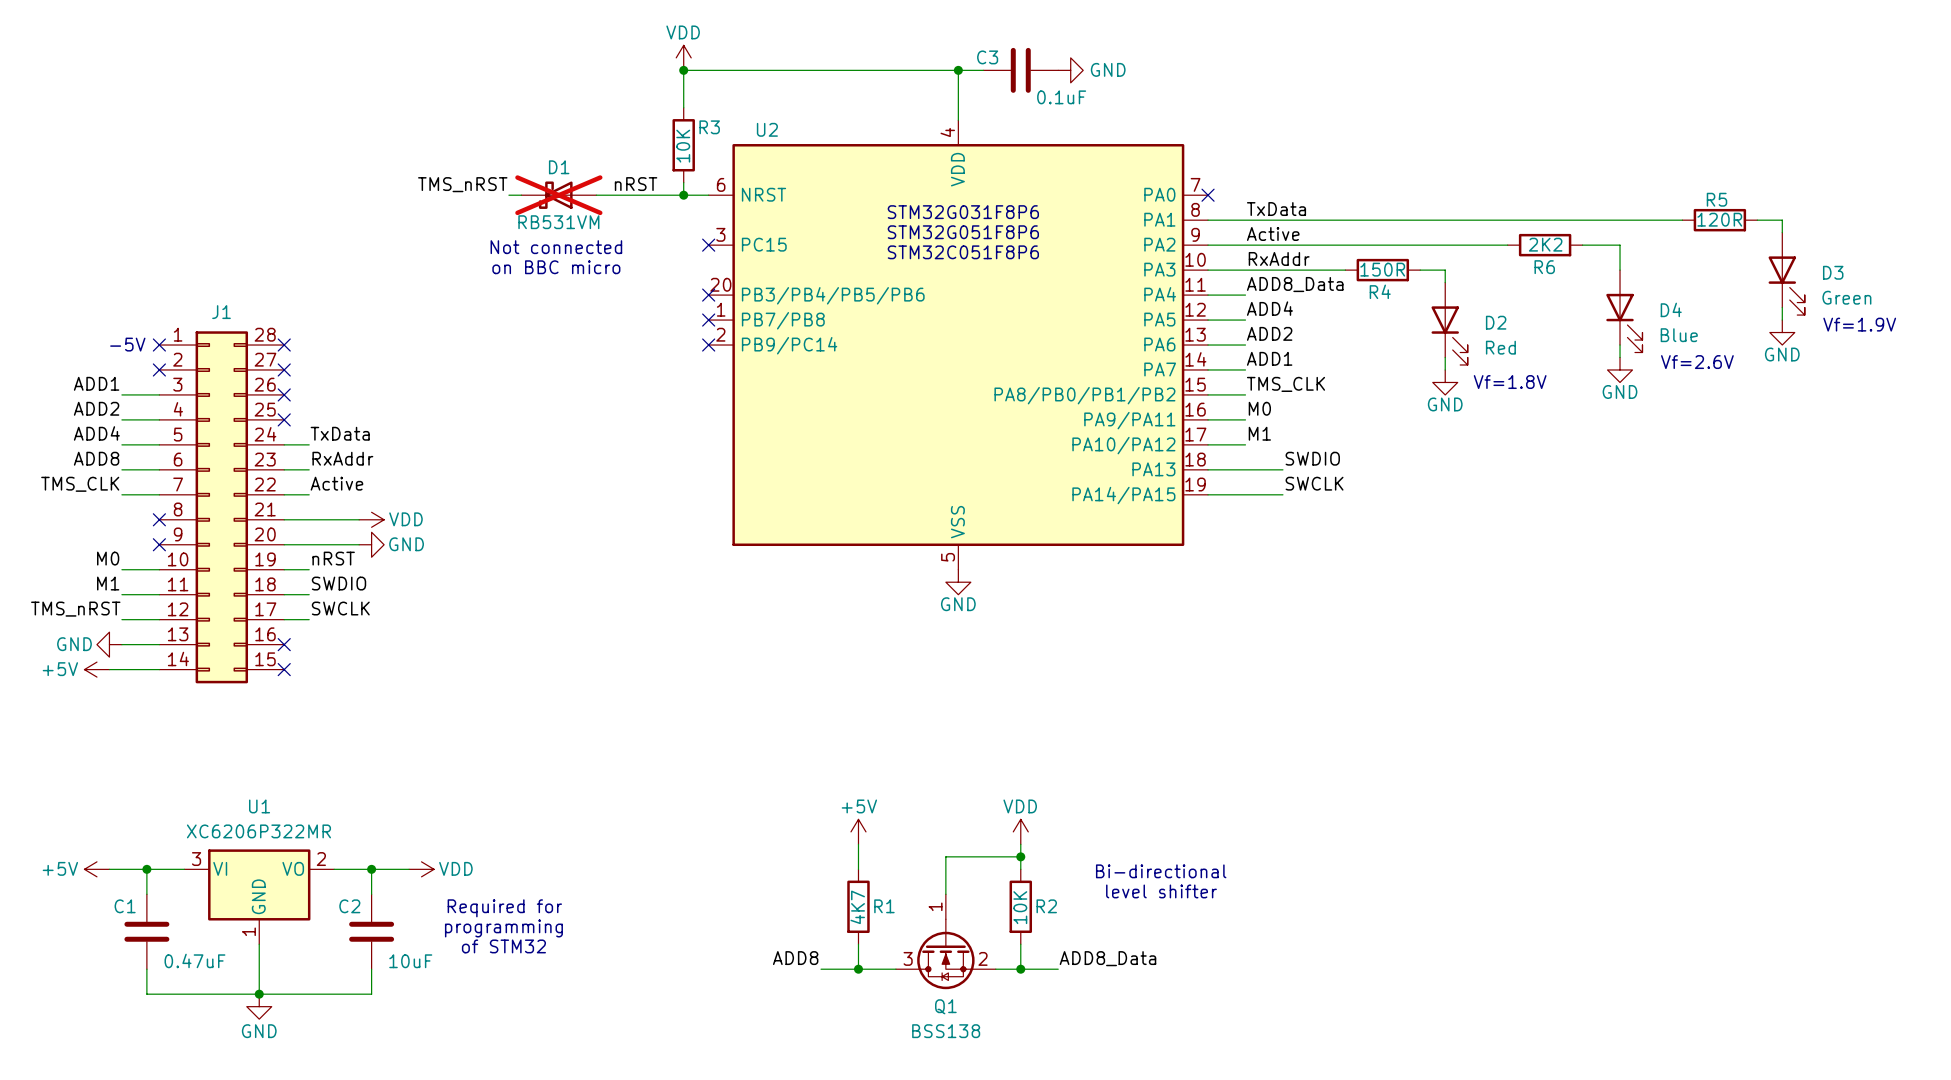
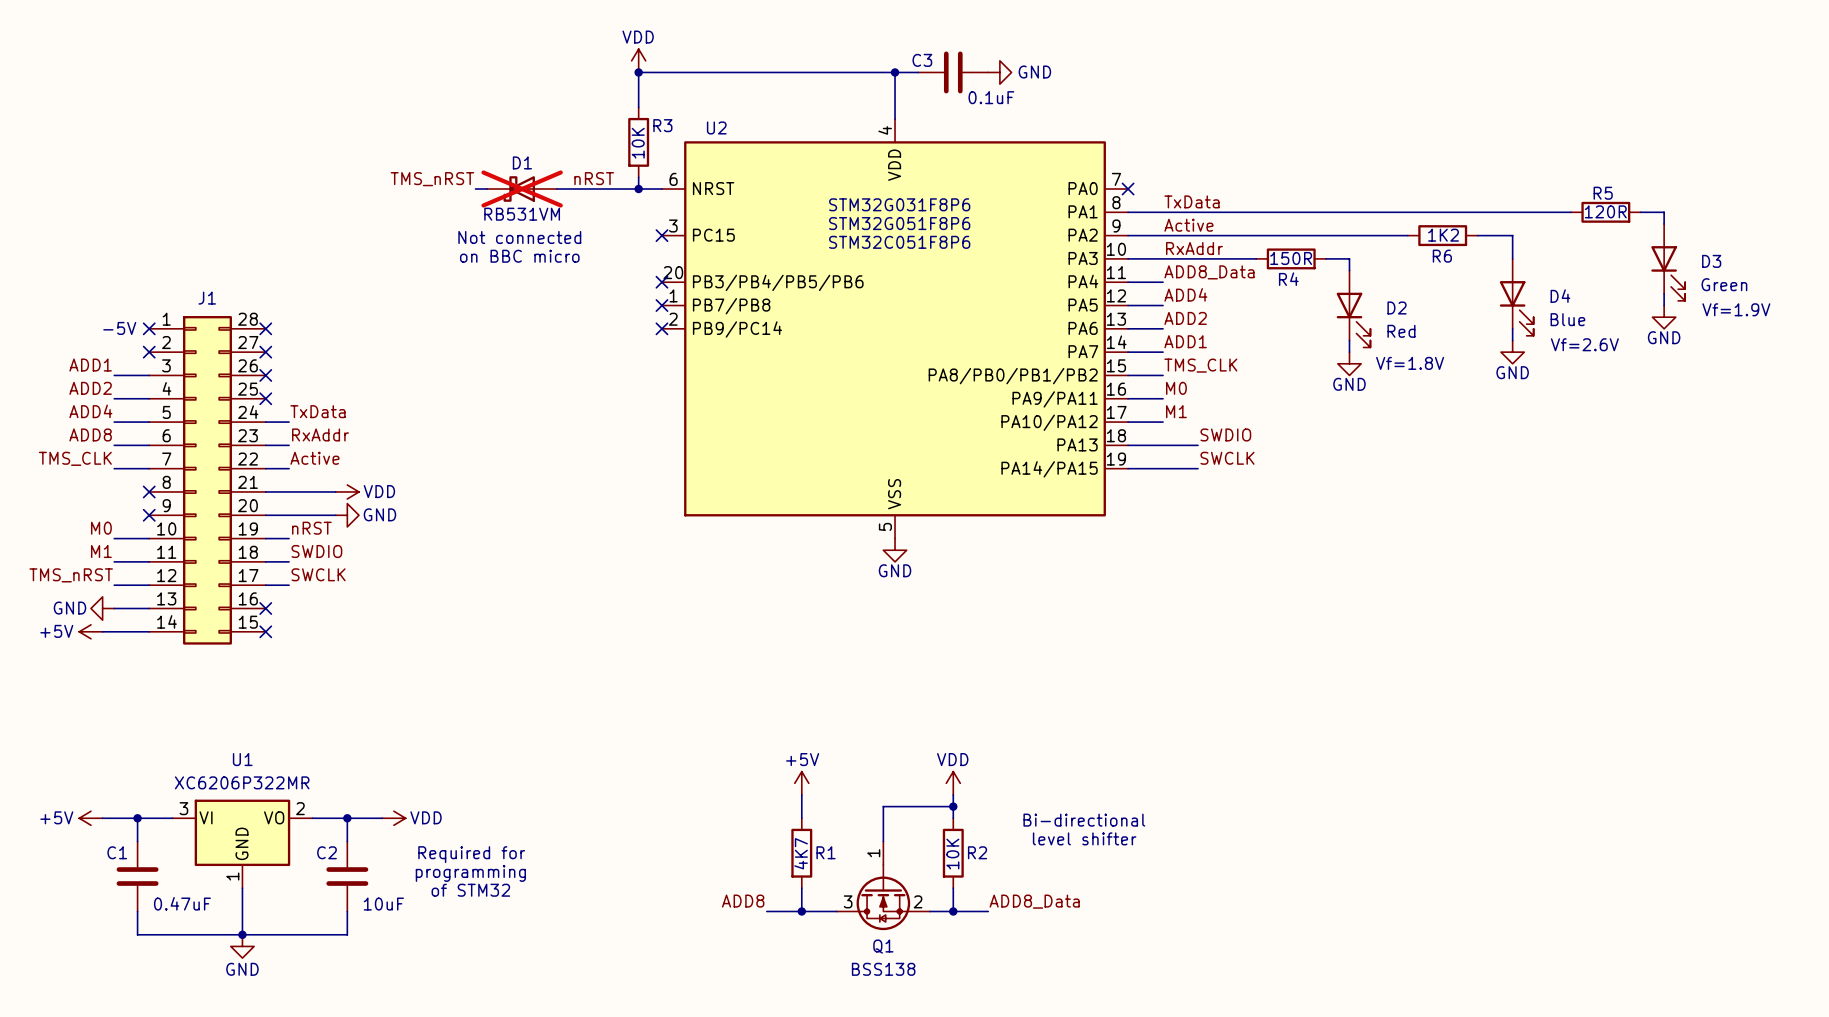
R6 value: 2K2 (1545, 244) -> 1K2 (1443, 235)

